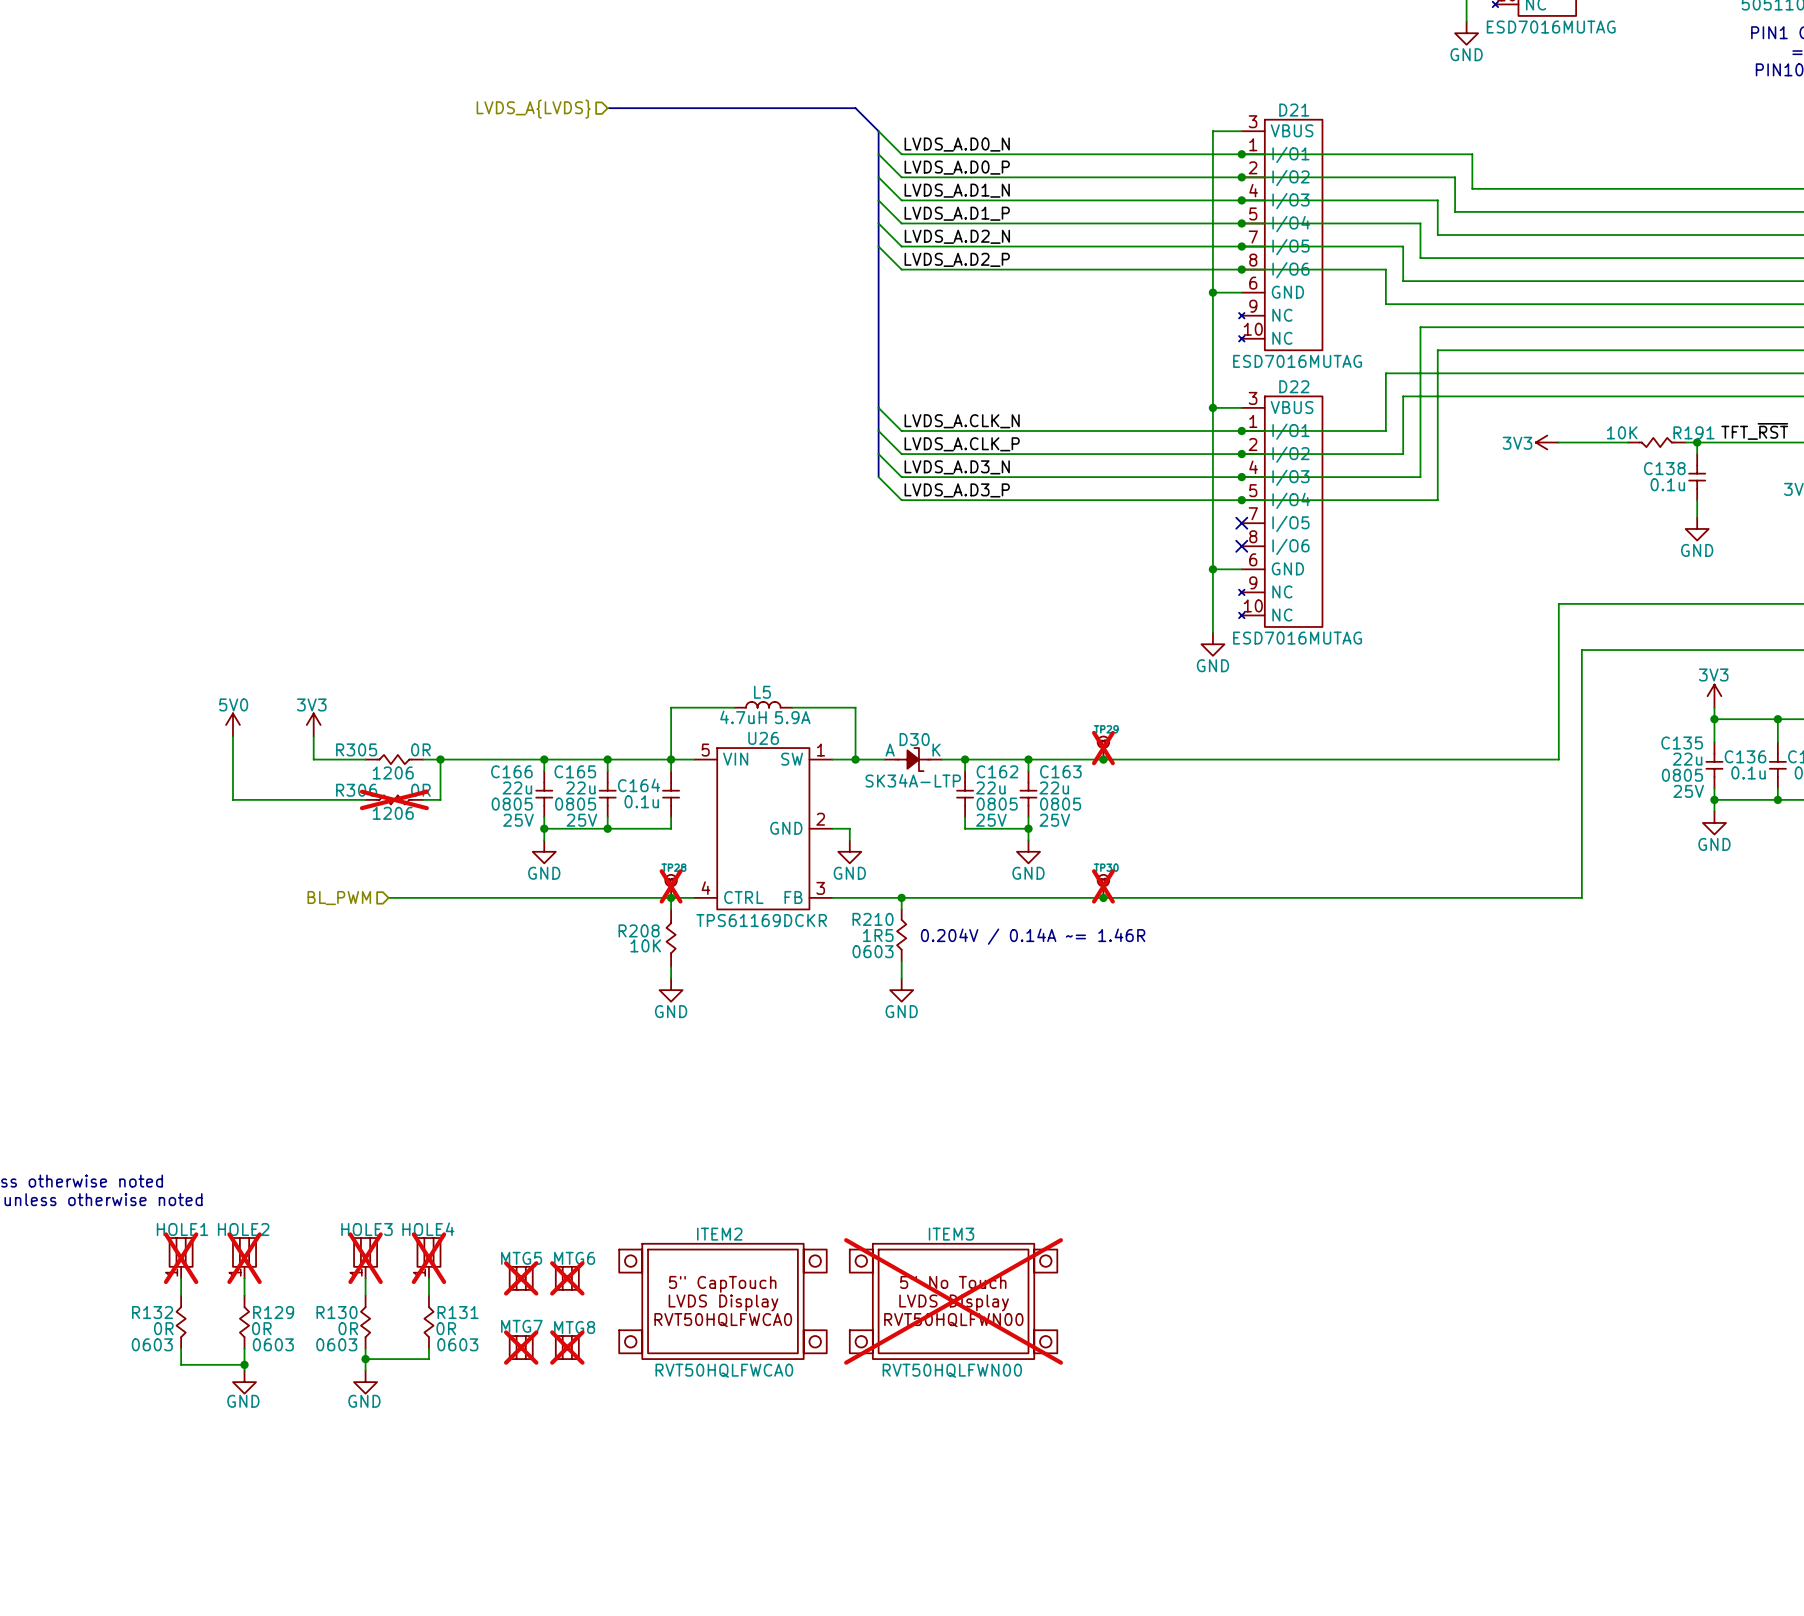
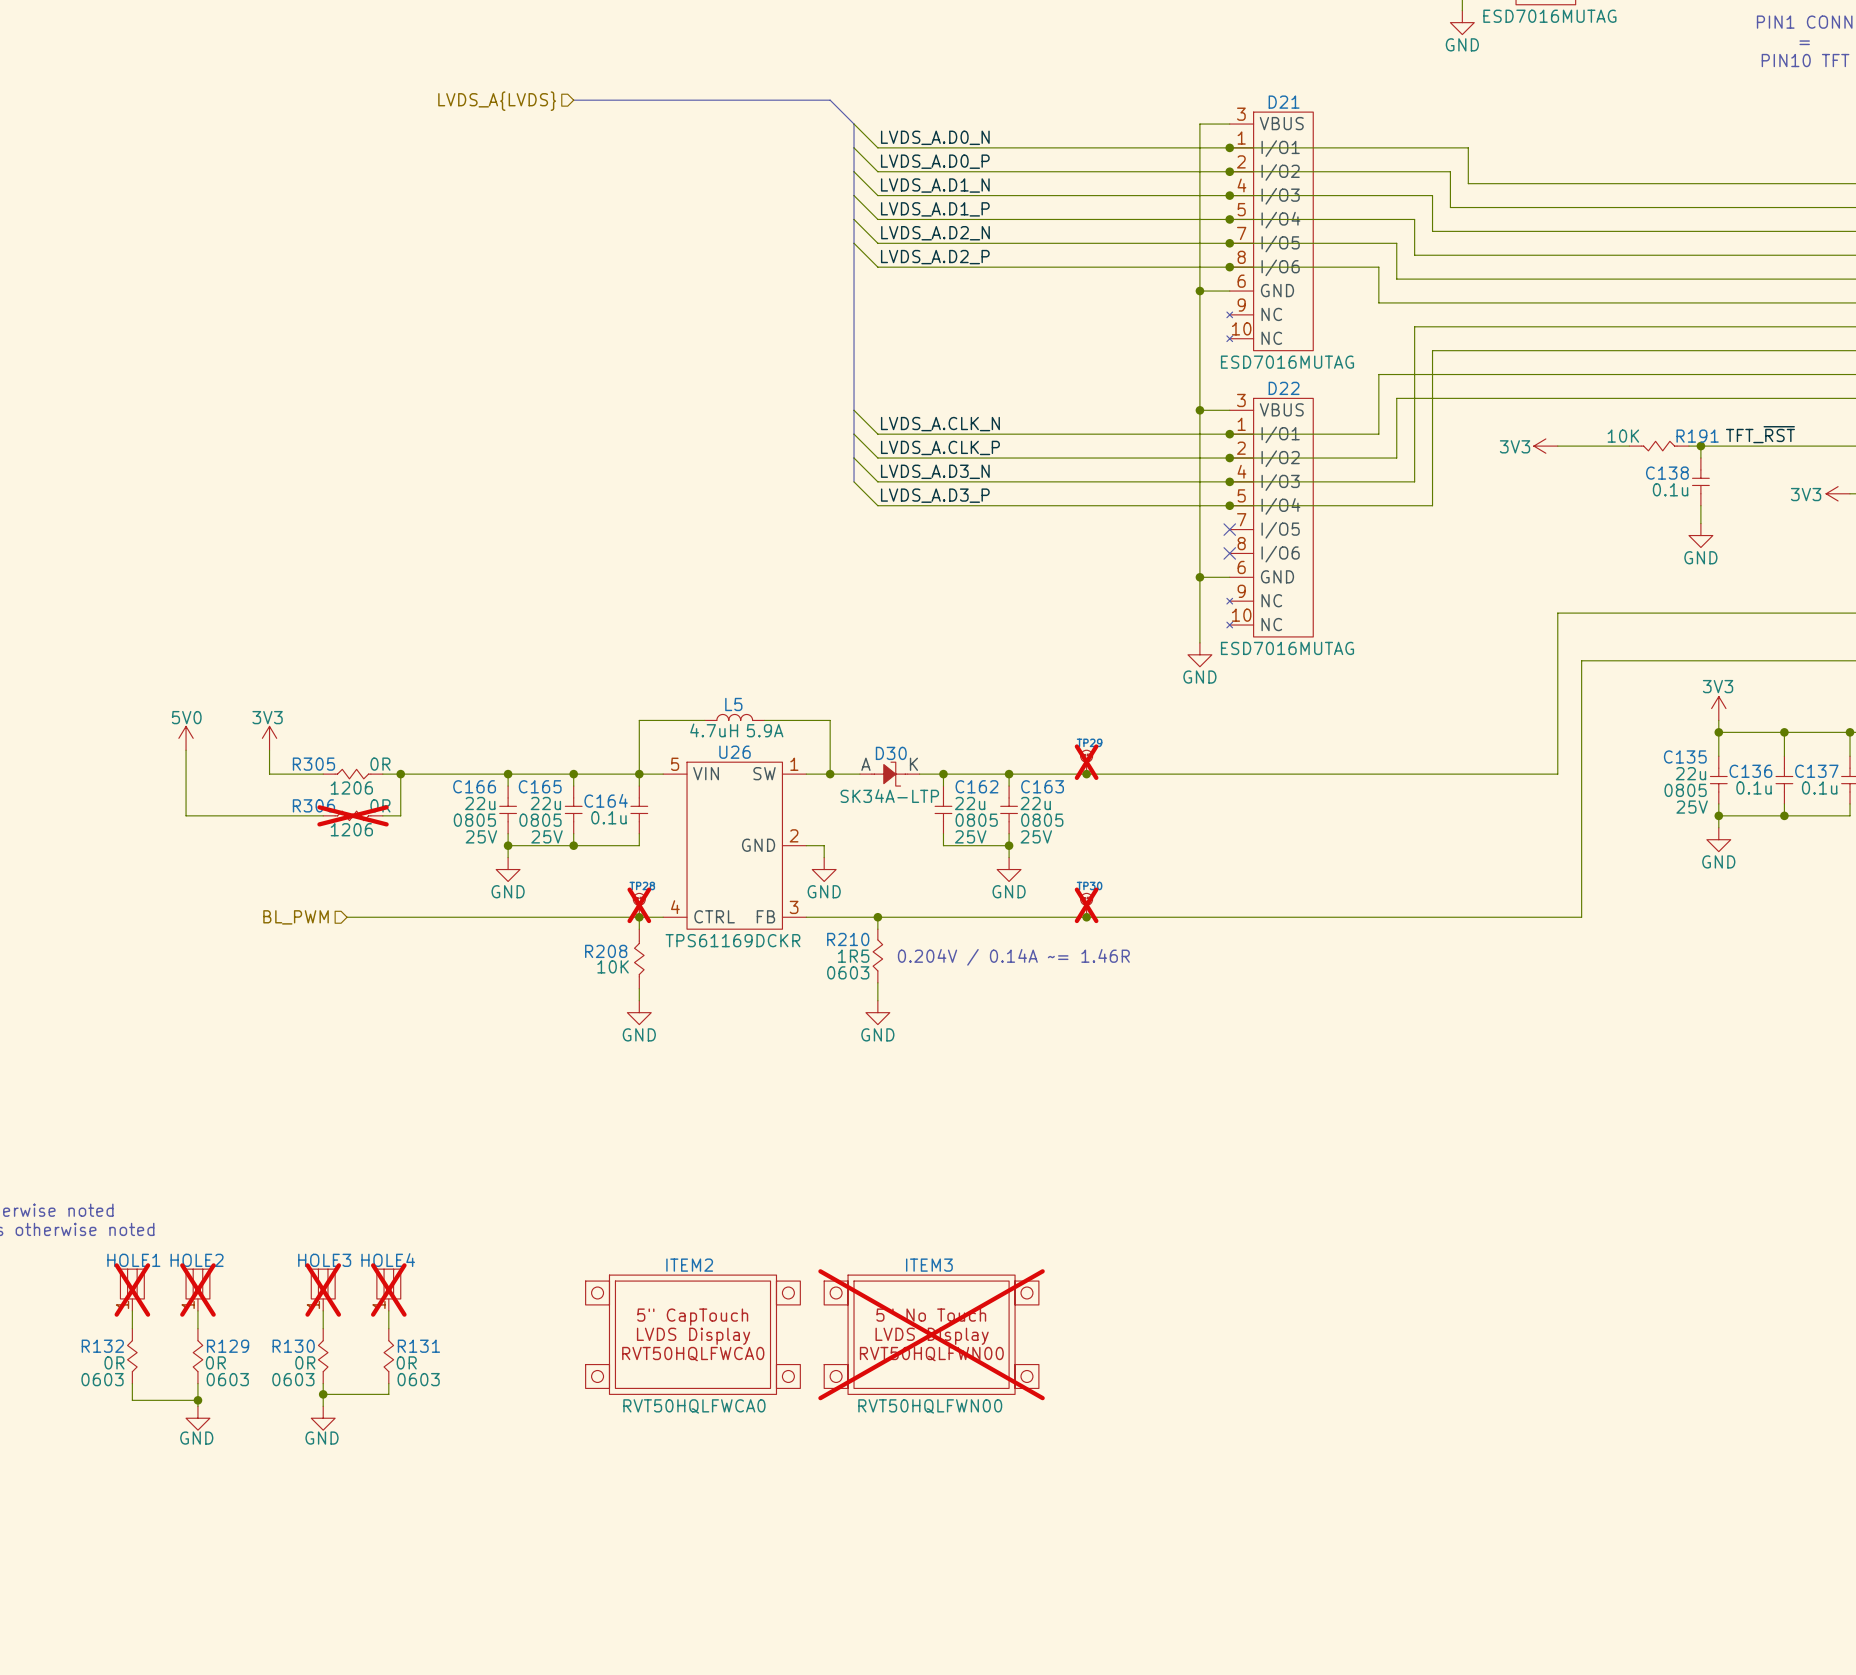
MTG5: (521, 1278) -> none
MTG6: (567, 1278) -> none
MTG7: (521, 1347) -> none
MTG8: (567, 1347) -> none

